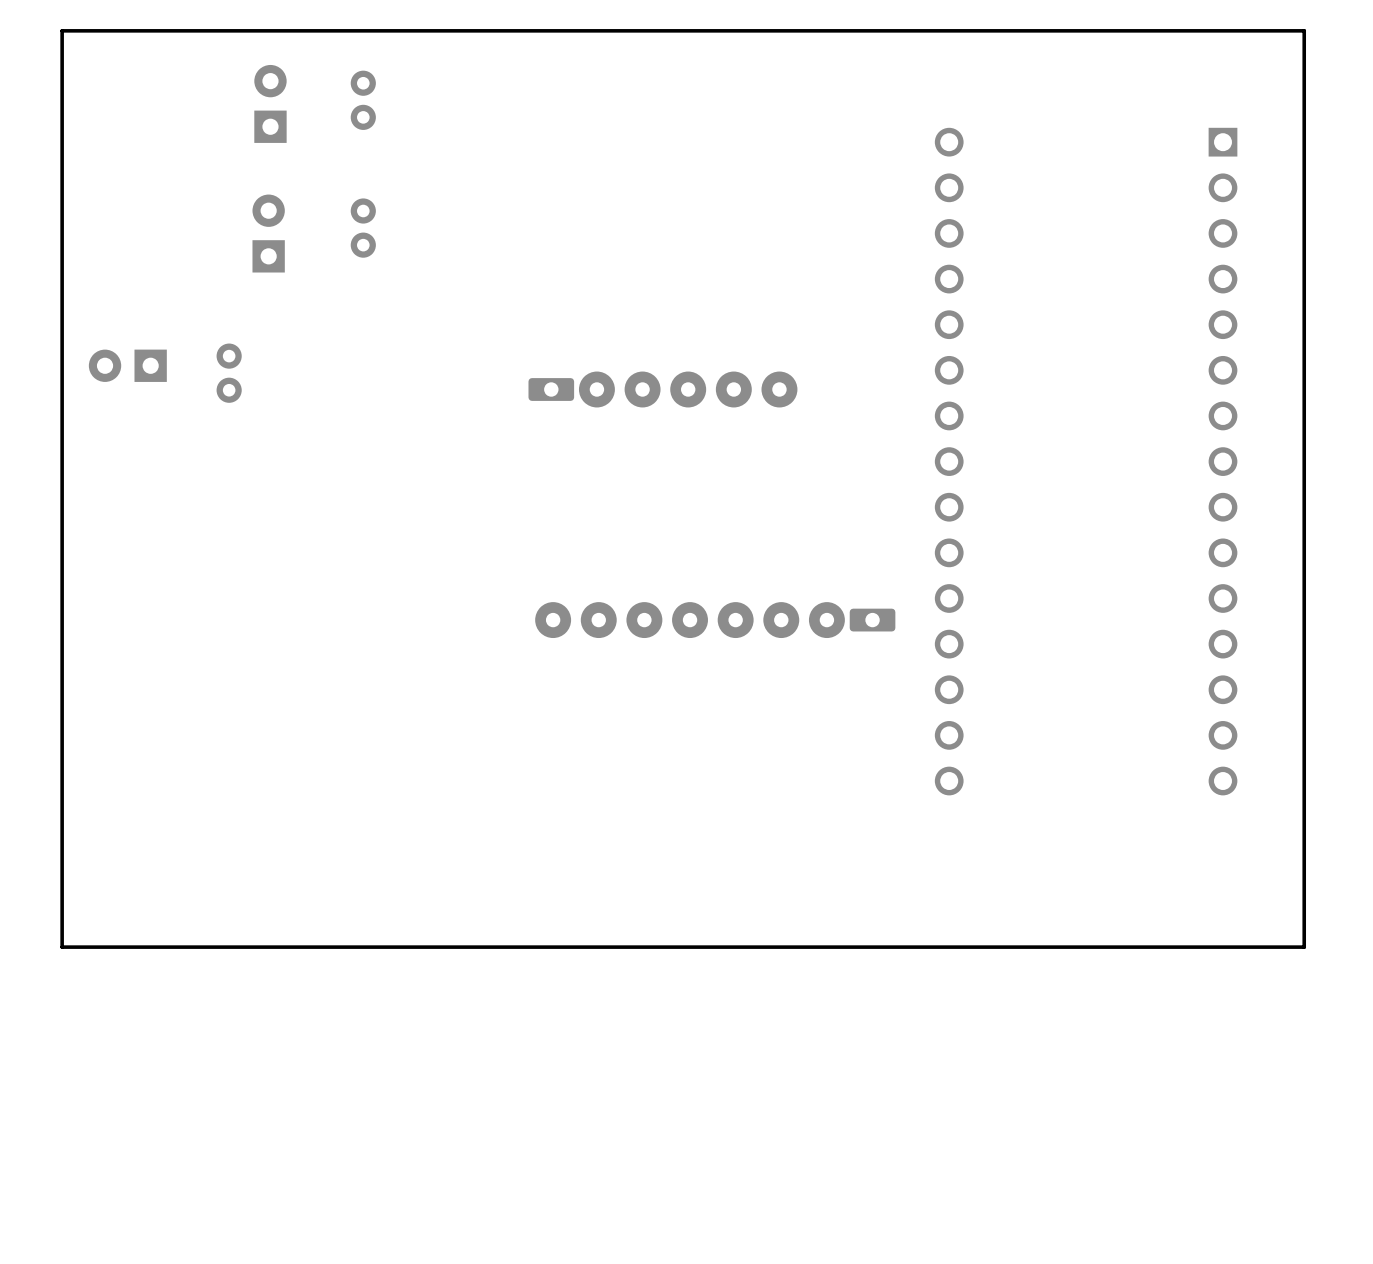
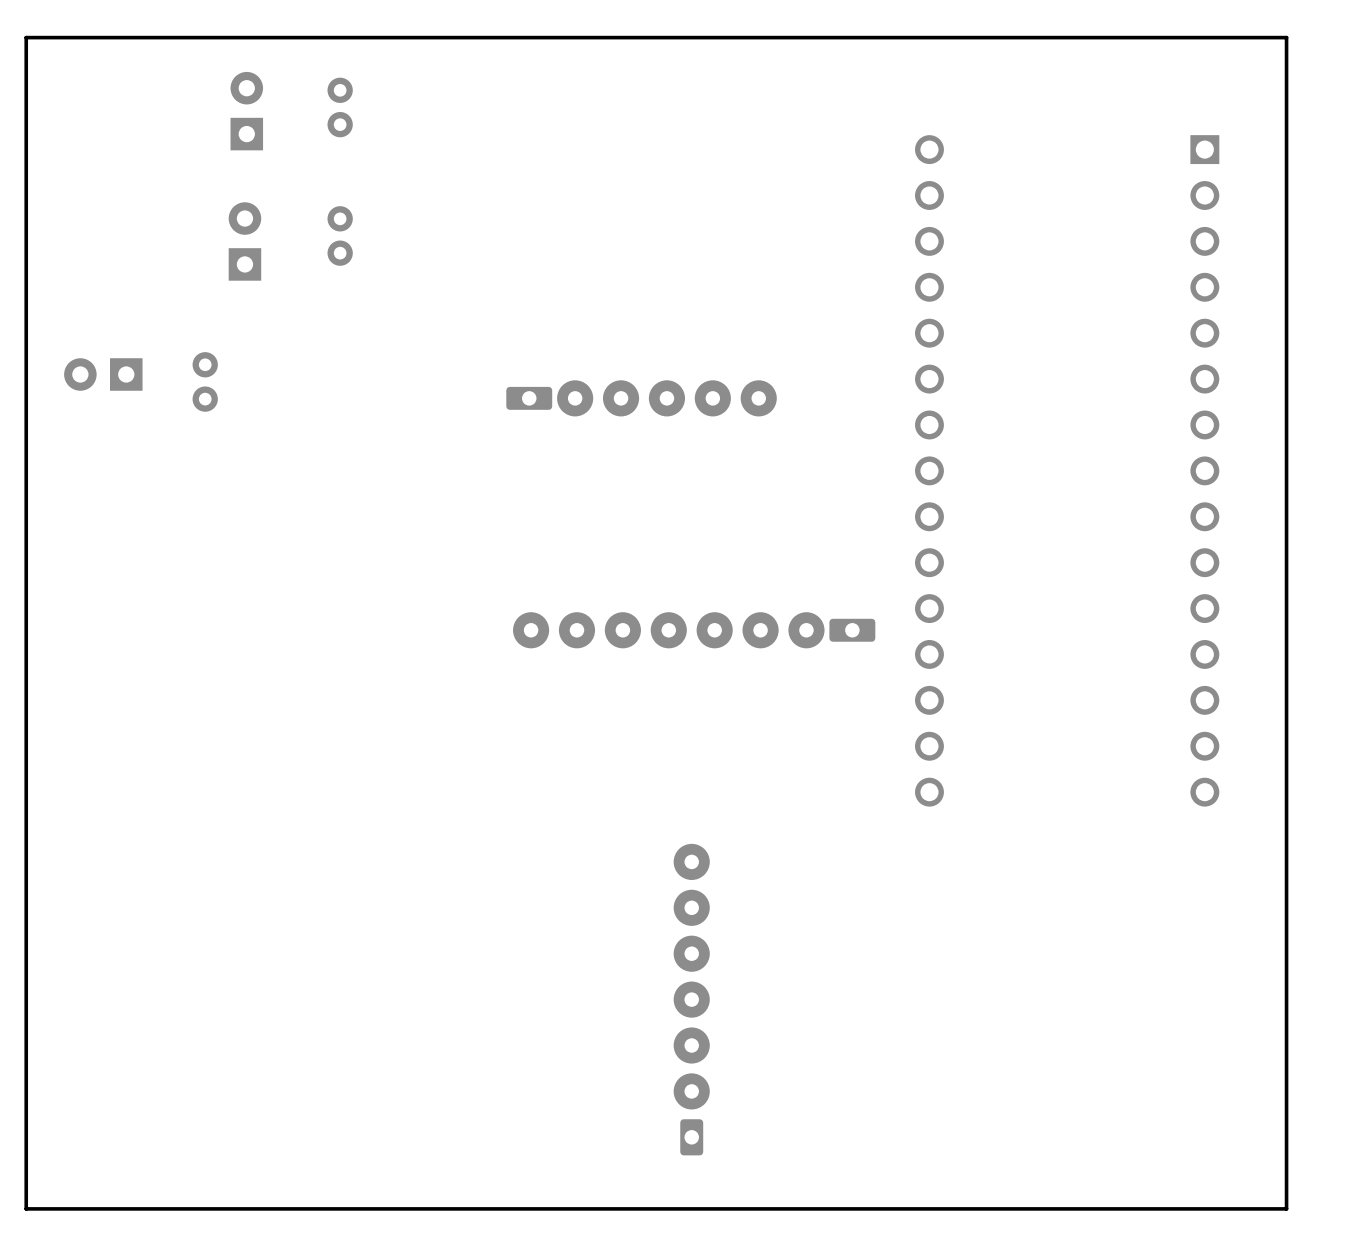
board edge: (62, 30) (62, 947) (1304, 947) -> (37, 37) (26, 37) (26, 1208) (1286, 1208) (1286, 959)
part: none -> (691, 999)

